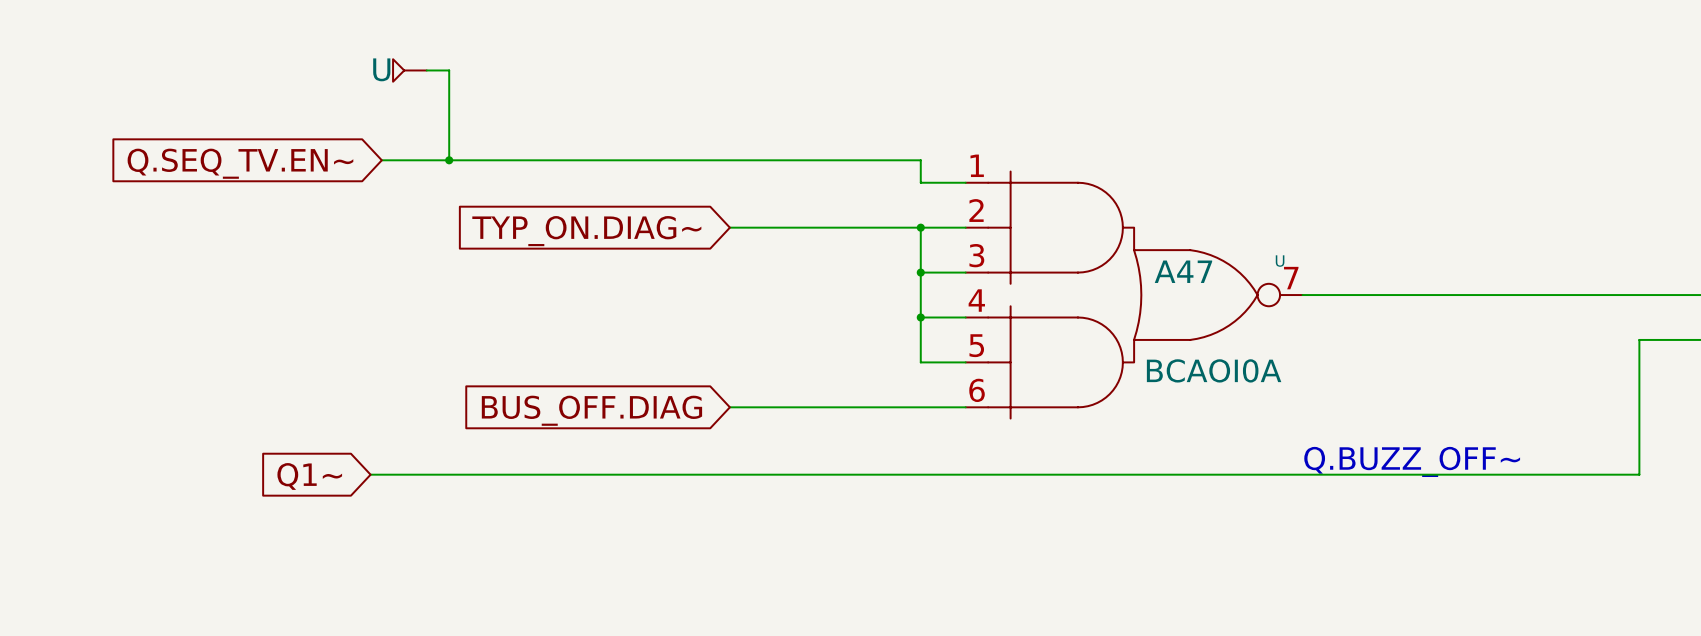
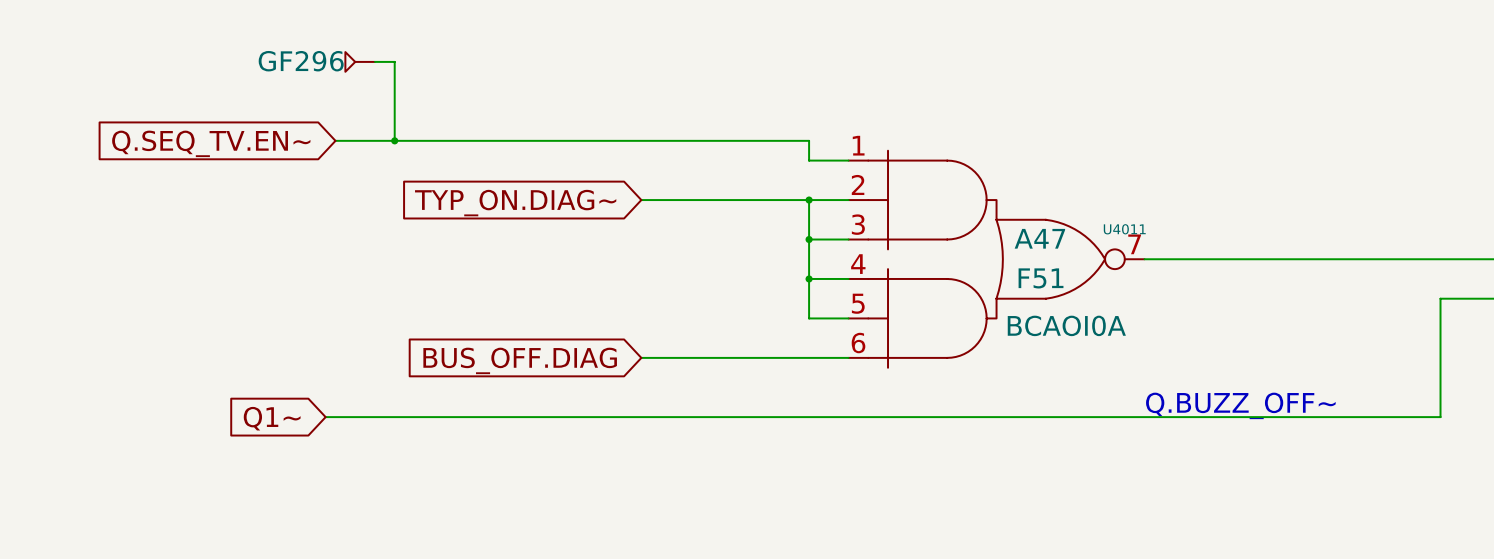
U name: U (381, 69) -> GF296 (301, 61)
U name: U (1280, 261) -> U4011 (1124, 229)
U value: none -> F51 (1041, 278)

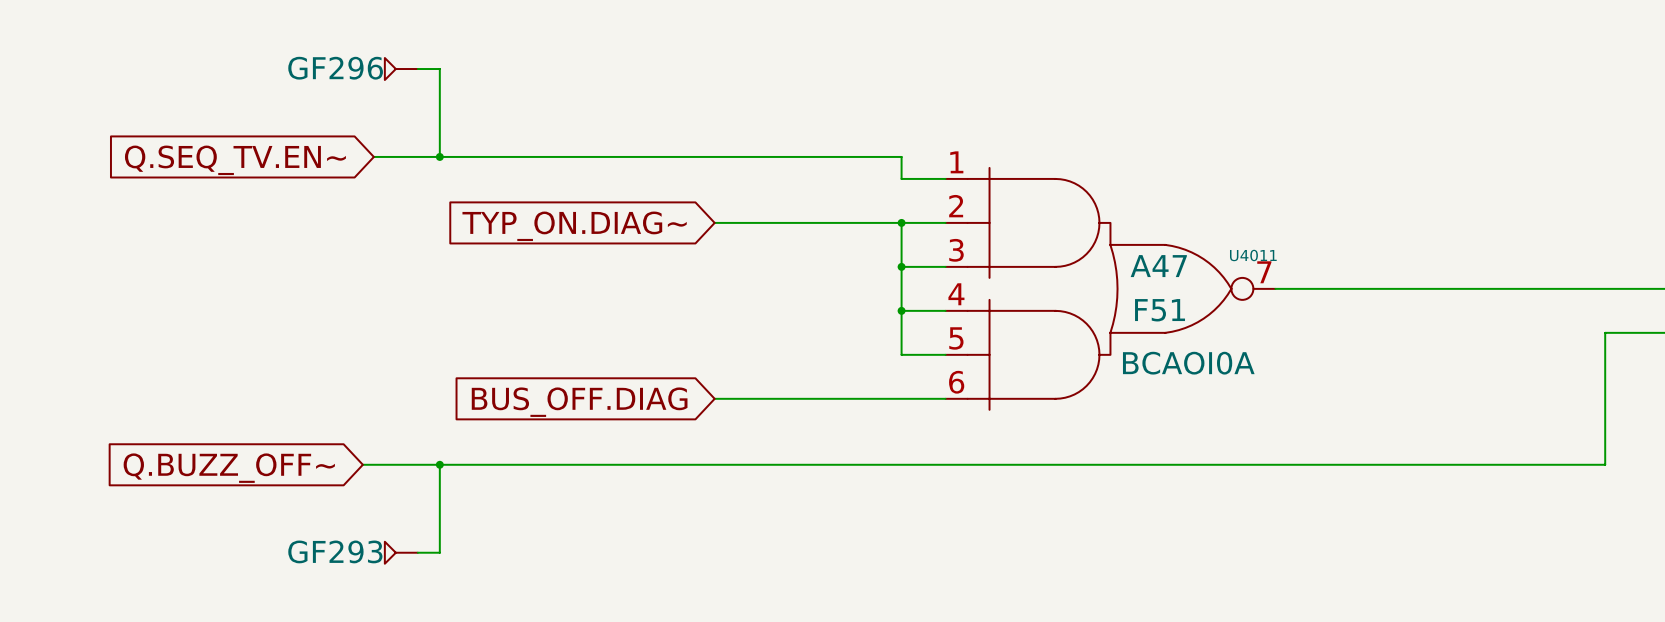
text: Q.BUZZ_OFF~ (1240, 405) -> none
wire: none -> (439, 464) (439, 552) (417, 552)
junction: none -> (439, 464)
global label: Q1~ (272, 418) -> Q.BUZZ_OFF~ (229, 468)
GF293: none -> (401, 552)

